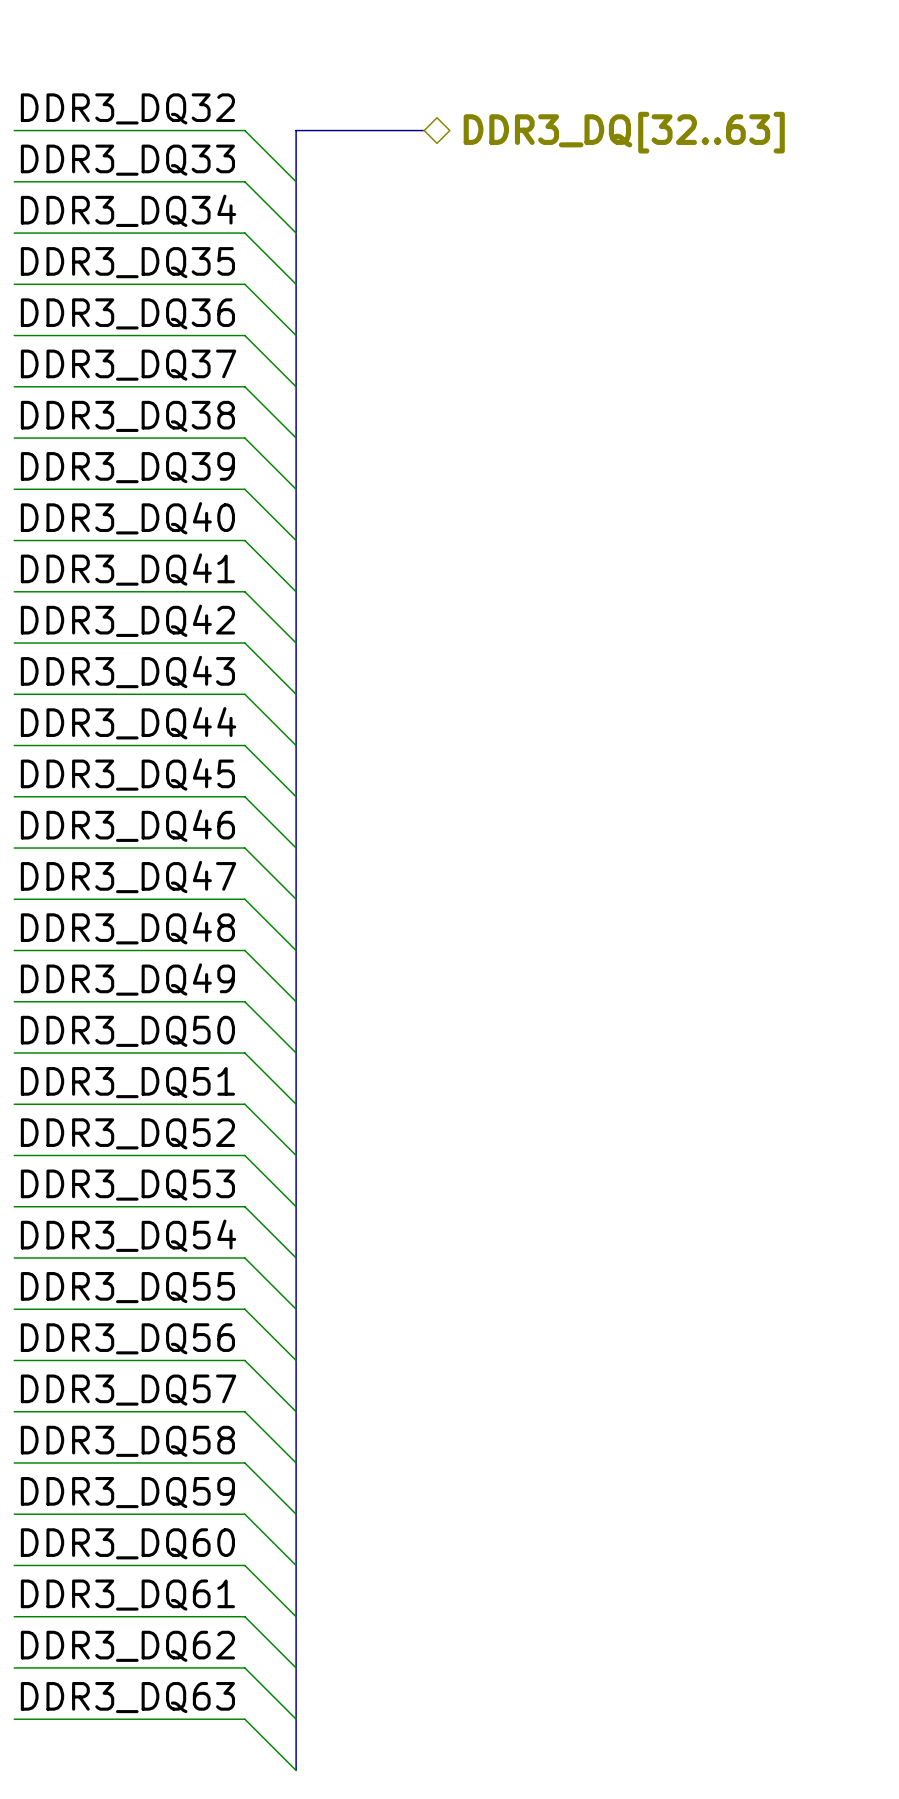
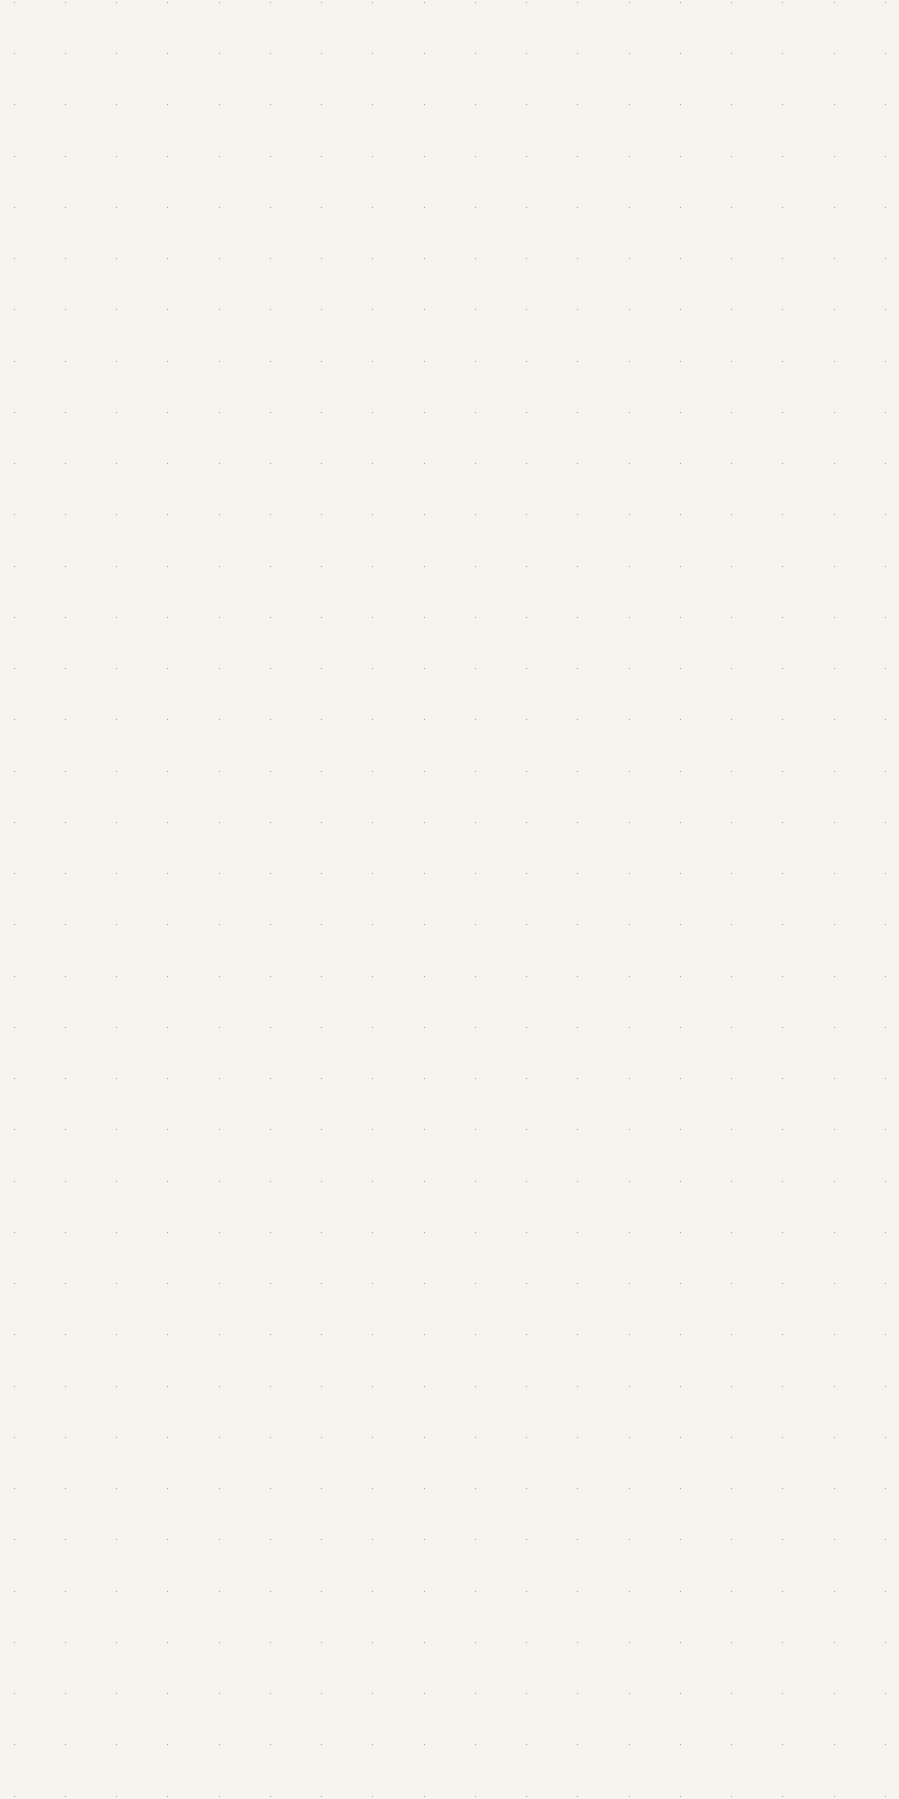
label: DDR3_DQ32 (127, 108) -> none
wire: (14, 130) (244, 130) (296, 181) -> none
bus: (424, 130) (296, 130) (296, 1770) -> none
hierarchical label: DDR3_DQ[32..63] (624, 132) -> none
label: DDR3_DQ33 (127, 160) -> none
wire: (14, 181) (244, 181) (296, 233) -> none
label: DDR3_DQ34 (128, 210) -> none
wire: (14, 233) (244, 233) (296, 284) -> none
label: DDR3_DQ35 (127, 262) -> none
wire: (14, 284) (244, 284) (296, 335) -> none
label: DDR3_DQ36 (127, 313) -> none
wire: (14, 335) (244, 335) (296, 386) -> none
label: DDR3_DQ37 (128, 365) -> none
wire: (14, 386) (244, 386) (296, 438) -> none
label: DDR3_DQ38 (127, 416) -> none
wire: (14, 438) (244, 438) (296, 489) -> none
label: DDR3_DQ39 (127, 467) -> none
wire: (14, 489) (244, 489) (296, 540) -> none
label: DDR3_DQ40 (127, 518) -> none
wire: (14, 540) (244, 540) (296, 591) -> none
label: DDR3_DQ41 (127, 569) -> none
wire: (14, 591) (244, 591) (296, 643) -> none
label: DDR3_DQ42 (127, 620) -> none
wire: (14, 643) (244, 643) (296, 694) -> none
label: DDR3_DQ43 (127, 672) -> none
wire: (14, 694) (244, 694) (296, 745) -> none
label: DDR3_DQ44 (128, 723) -> none
wire: (14, 745) (244, 745) (296, 796) -> none
label: DDR3_DQ45 (127, 774) -> none
wire: (14, 796) (244, 796) (296, 848) -> none
label: DDR3_DQ46 (127, 825) -> none
wire: (14, 848) (244, 848) (296, 899) -> none
label: DDR3_DQ47 (128, 877) -> none
wire: (14, 899) (244, 899) (296, 950) -> none
label: DDR3_DQ48 (127, 928) -> none
wire: (14, 950) (244, 950) (296, 1001) -> none
label: DDR3_DQ49 (127, 979) -> none
wire: (14, 1001) (244, 1001) (296, 1053) -> none
label: DDR3_DQ50 (127, 1031) -> none
wire: (14, 1053) (244, 1053) (296, 1104) -> none
label: DDR3_DQ51 (127, 1082) -> none
wire: (14, 1104) (244, 1104) (296, 1155) -> none
label: DDR3_DQ52 (127, 1133) -> none
wire: (14, 1155) (244, 1155) (296, 1206) -> none
label: DDR3_DQ53 (127, 1185) -> none
wire: (14, 1206) (244, 1206) (296, 1257) -> none
label: DDR3_DQ54 (128, 1235) -> none
wire: (14, 1257) (244, 1257) (296, 1309) -> none
label: DDR3_DQ55 (127, 1287) -> none
wire: (14, 1309) (244, 1309) (296, 1360) -> none
label: DDR3_DQ56 (127, 1338) -> none
wire: (14, 1360) (244, 1360) (296, 1411) -> none
label: DDR3_DQ57 (128, 1390) -> none
wire: (14, 1411) (244, 1411) (296, 1462) -> none
label: DDR3_DQ58 (127, 1441) -> none
wire: (14, 1462) (244, 1462) (296, 1514) -> none
label: DDR3_DQ59 (127, 1492) -> none
wire: (14, 1514) (244, 1514) (296, 1565) -> none
label: DDR3_DQ60 (127, 1543) -> none
wire: (14, 1565) (244, 1565) (296, 1616) -> none
label: DDR3_DQ61 (127, 1595) -> none
wire: (14, 1616) (244, 1616) (296, 1667) -> none
label: DDR3_DQ62 (127, 1646) -> none
wire: (14, 1667) (244, 1667) (296, 1719) -> none
label: DDR3_DQ63 (127, 1697) -> none
wire: (14, 1719) (244, 1719) (296, 1770) -> none

